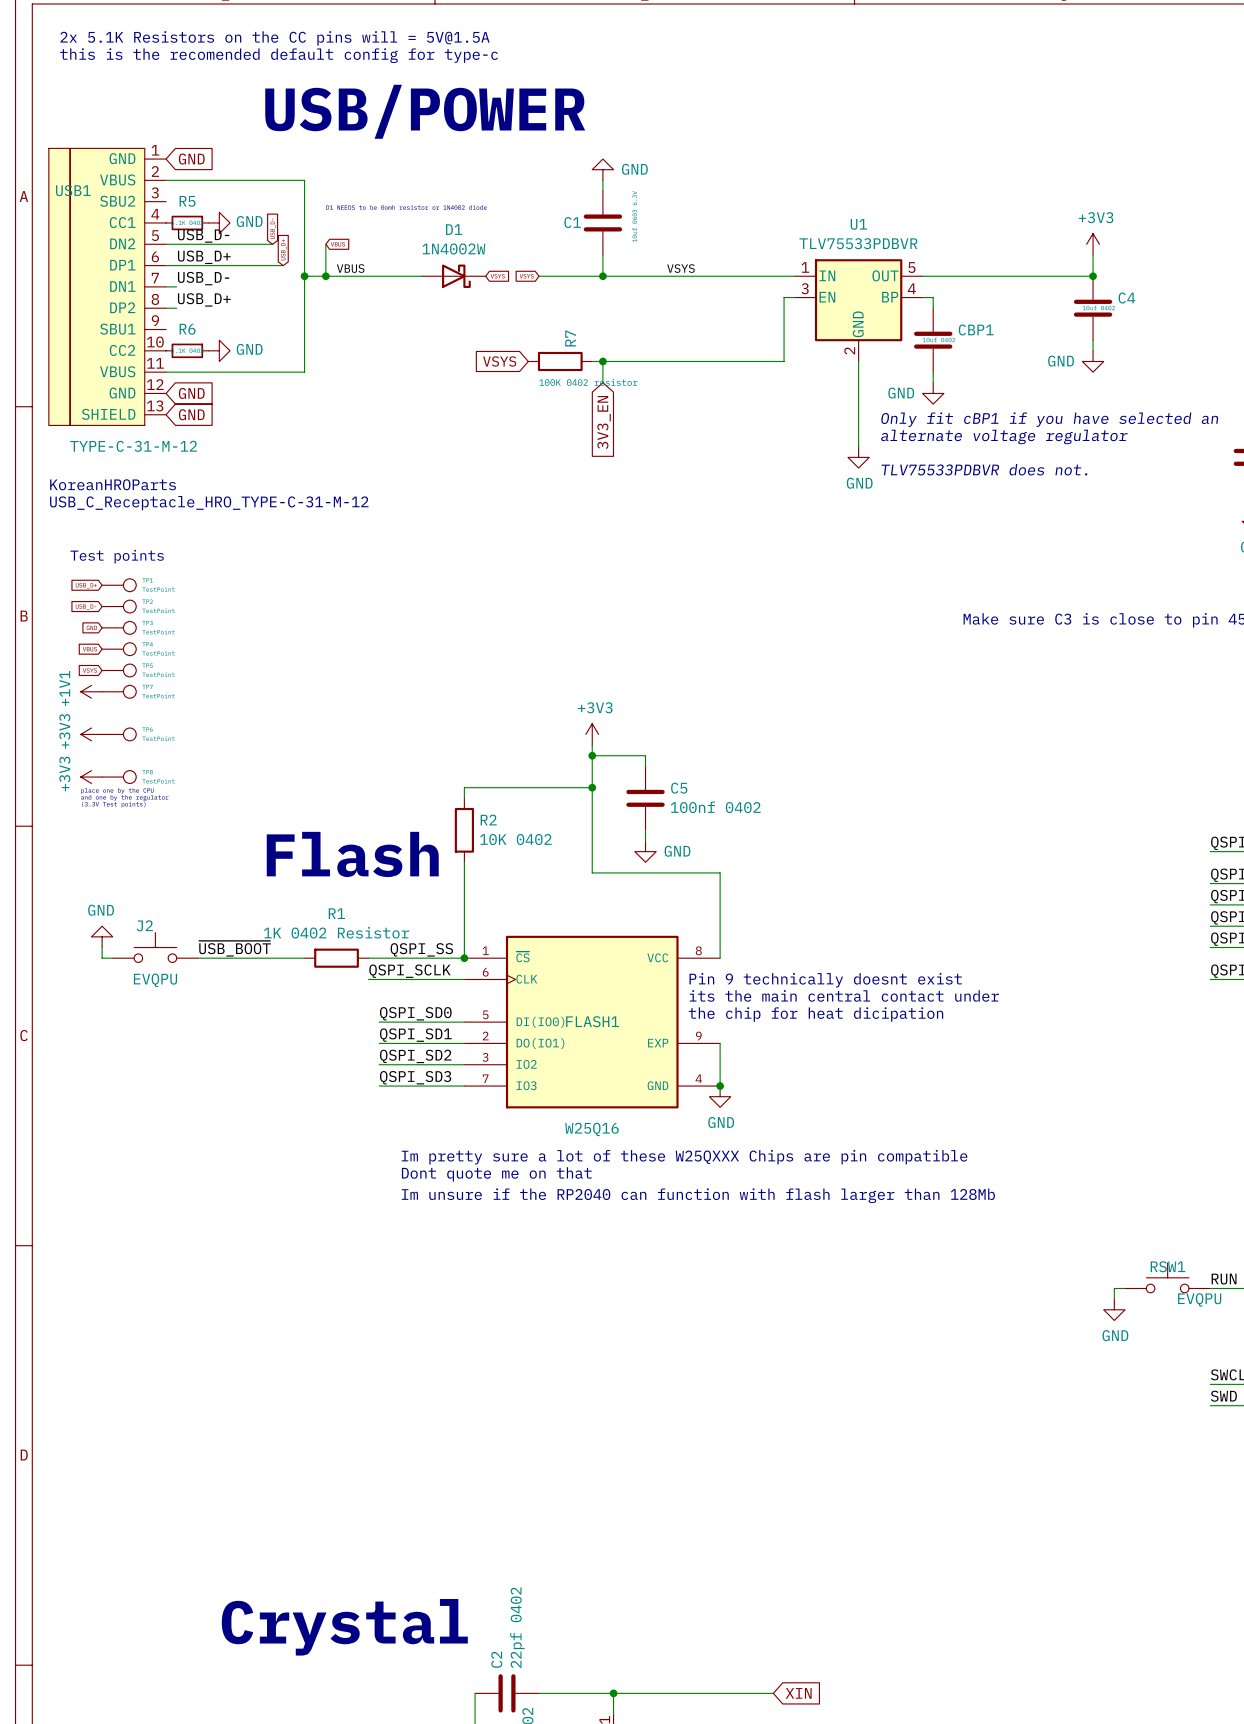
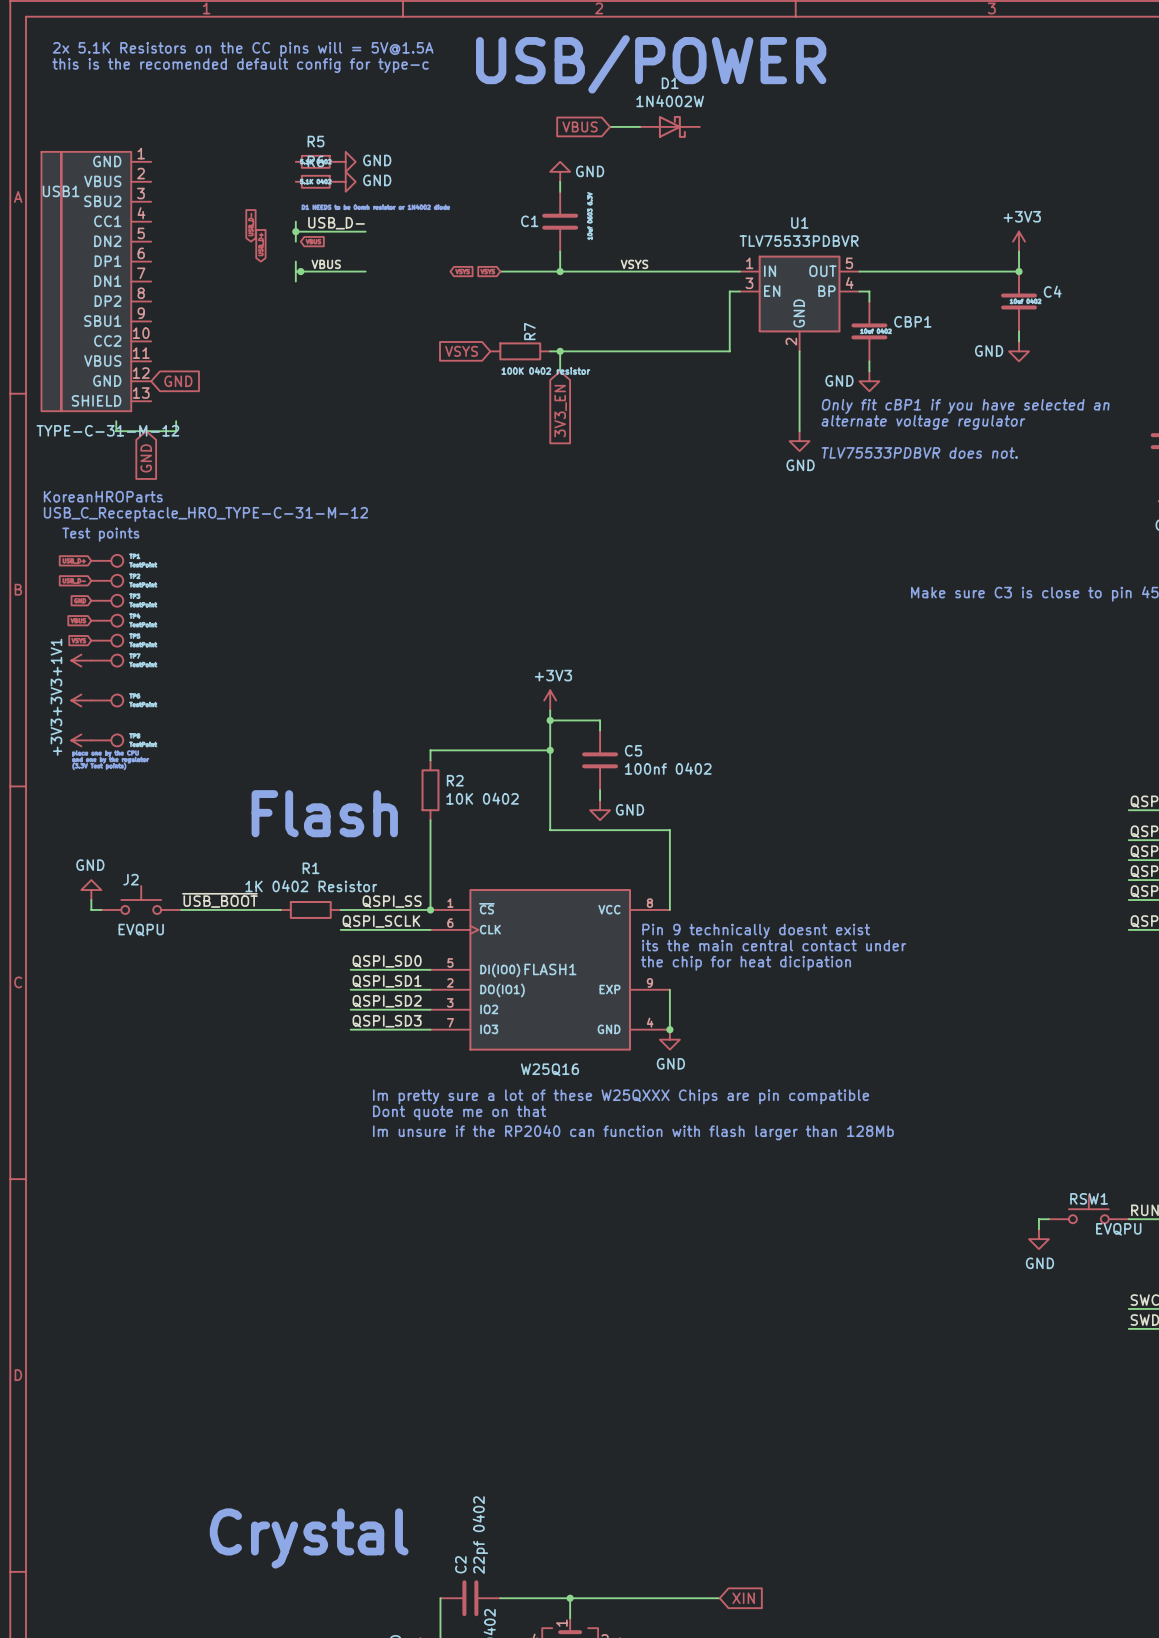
text: none -> USB/POWER (651, 64)
text: USB/POWER (425, 111) -> none
global label: none -> VBUS (580, 126)
wire: none -> (610, 126) (639, 126)
global label: GND (191, 159) -> none
power symbol: none -> GND (345, 161)
wire: (166, 180) (304, 180) (304, 372) (166, 372) -> none
power symbol: none -> GND (345, 181)
R5 position: (187, 222) -> (315, 161)
power symbol: GND (219, 222) -> none
wire: none -> (295, 221) (295, 241)
label: none -> USB_D- (336, 223)
wire: none -> (295, 231) (365, 231)
label: USB_D- (203, 235) -> none
wire: (166, 244) (272, 244) -> none
wire: (325, 244) (325, 276) -> none
label: USB_D+ (204, 257) -> none
wire: (166, 265) (283, 265) -> none
wire: none -> (295, 261) (295, 281)
wire: (304, 276) (320, 276) -> none
junction position: (304, 276) -> (295, 231)
wire: (395, 276) (421, 276) -> none
D1 position: (453, 276) -> (669, 126)
label: USB_D- (203, 278) -> none
wire: (166, 286) (176, 286) -> none
label: USB_D+ (204, 299) -> none
wire: (166, 308) (176, 308) -> none
R6 position: (187, 350) -> (315, 181)
power symbol: GND (219, 350) -> none
global label rotation: 0° (191, 414) -> 90° clockwise (146, 458)
global label position: GND (191, 414) -> GND (146, 458)
wire: none -> (116, 421) (116, 431) (176, 431) (176, 421)
text position: KoreanHROParts (113, 484) -> KoreanHROParts (103, 496)
text position: USB_C_Receptacle_HRO_TYPE-C-31-M-12 (209, 503) -> USB_C_Receptacle_HRO_TYPE-C-31-M-12 (205, 514)

